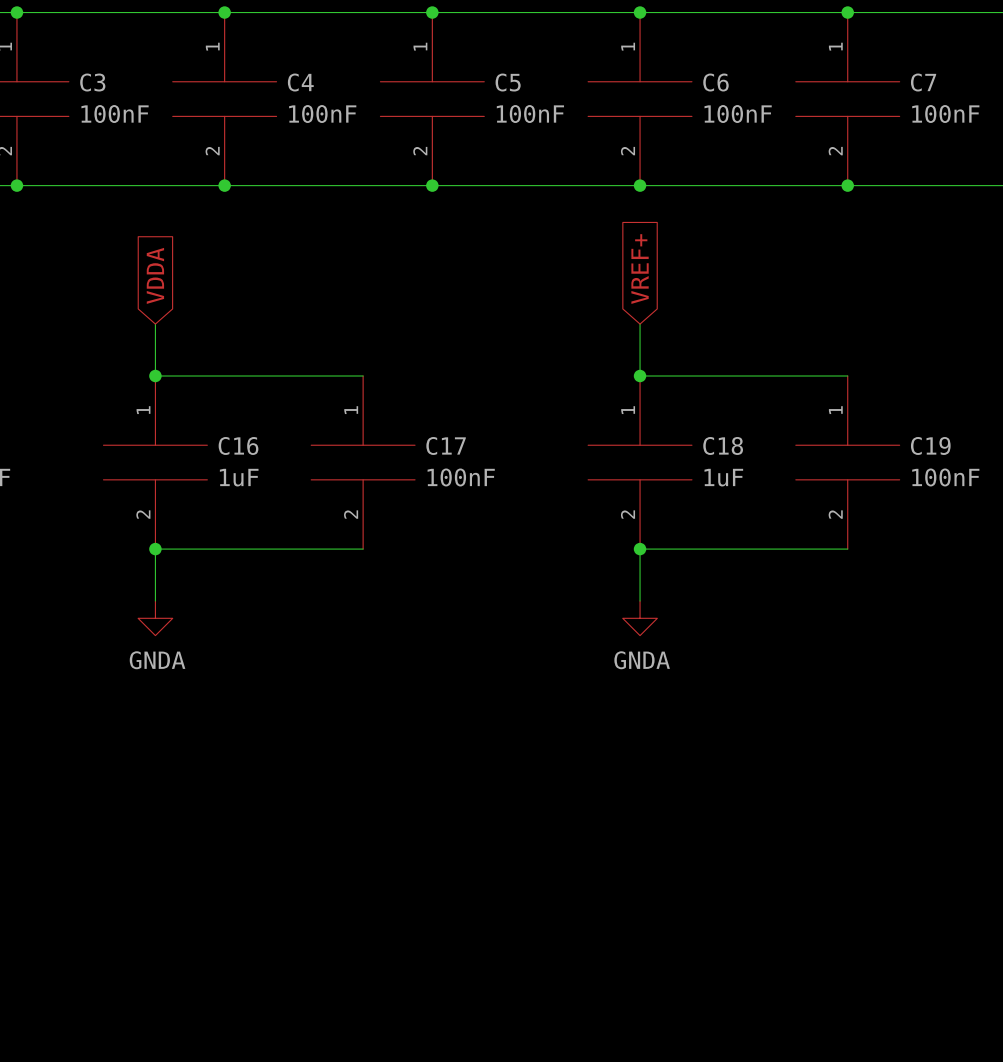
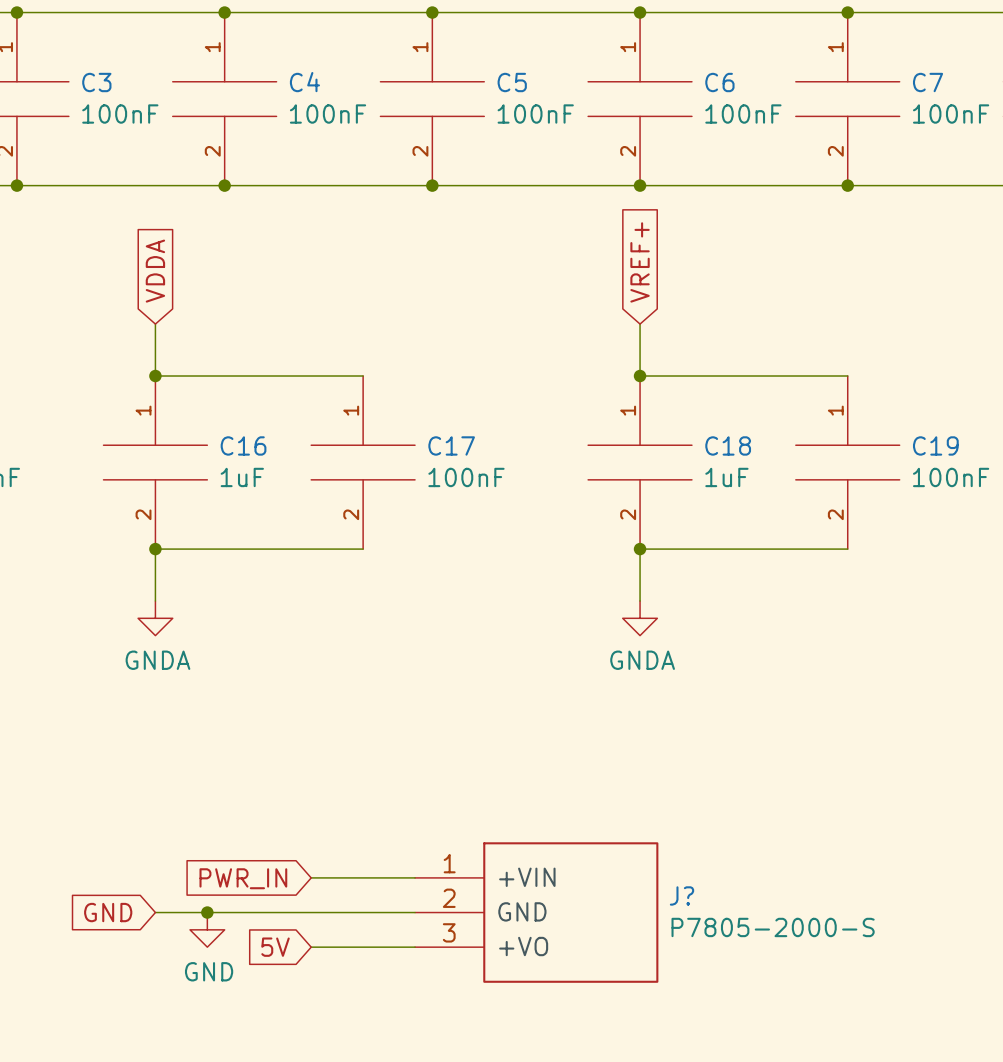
wire: none -> (311, 877) (415, 877)
global label: none -> PWR_IN (243, 878)
global label: none -> GND (108, 912)
wire: none -> (155, 912) (415, 912)
junction: none -> (207, 912)
J?: none -> P7805-2000-S (536, 912)
power symbol: none -> GND (207, 929)
global label: none -> 5V (275, 947)
wire: none -> (311, 947) (415, 947)

